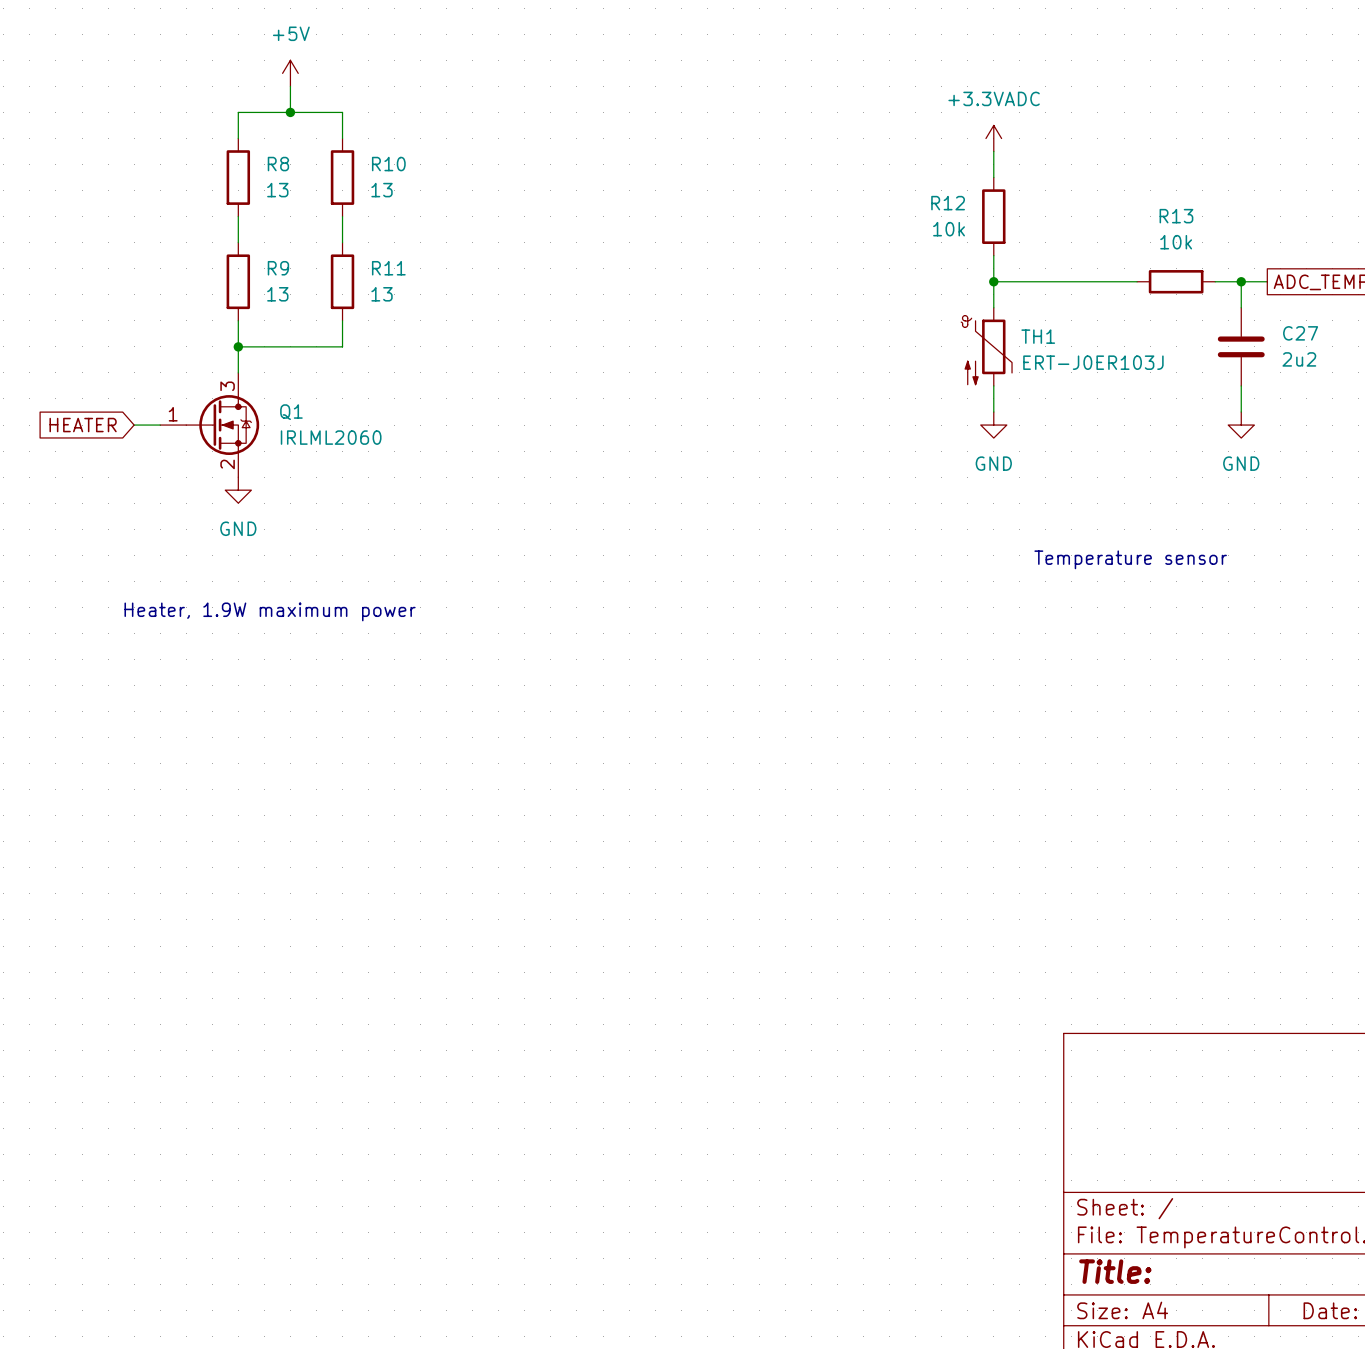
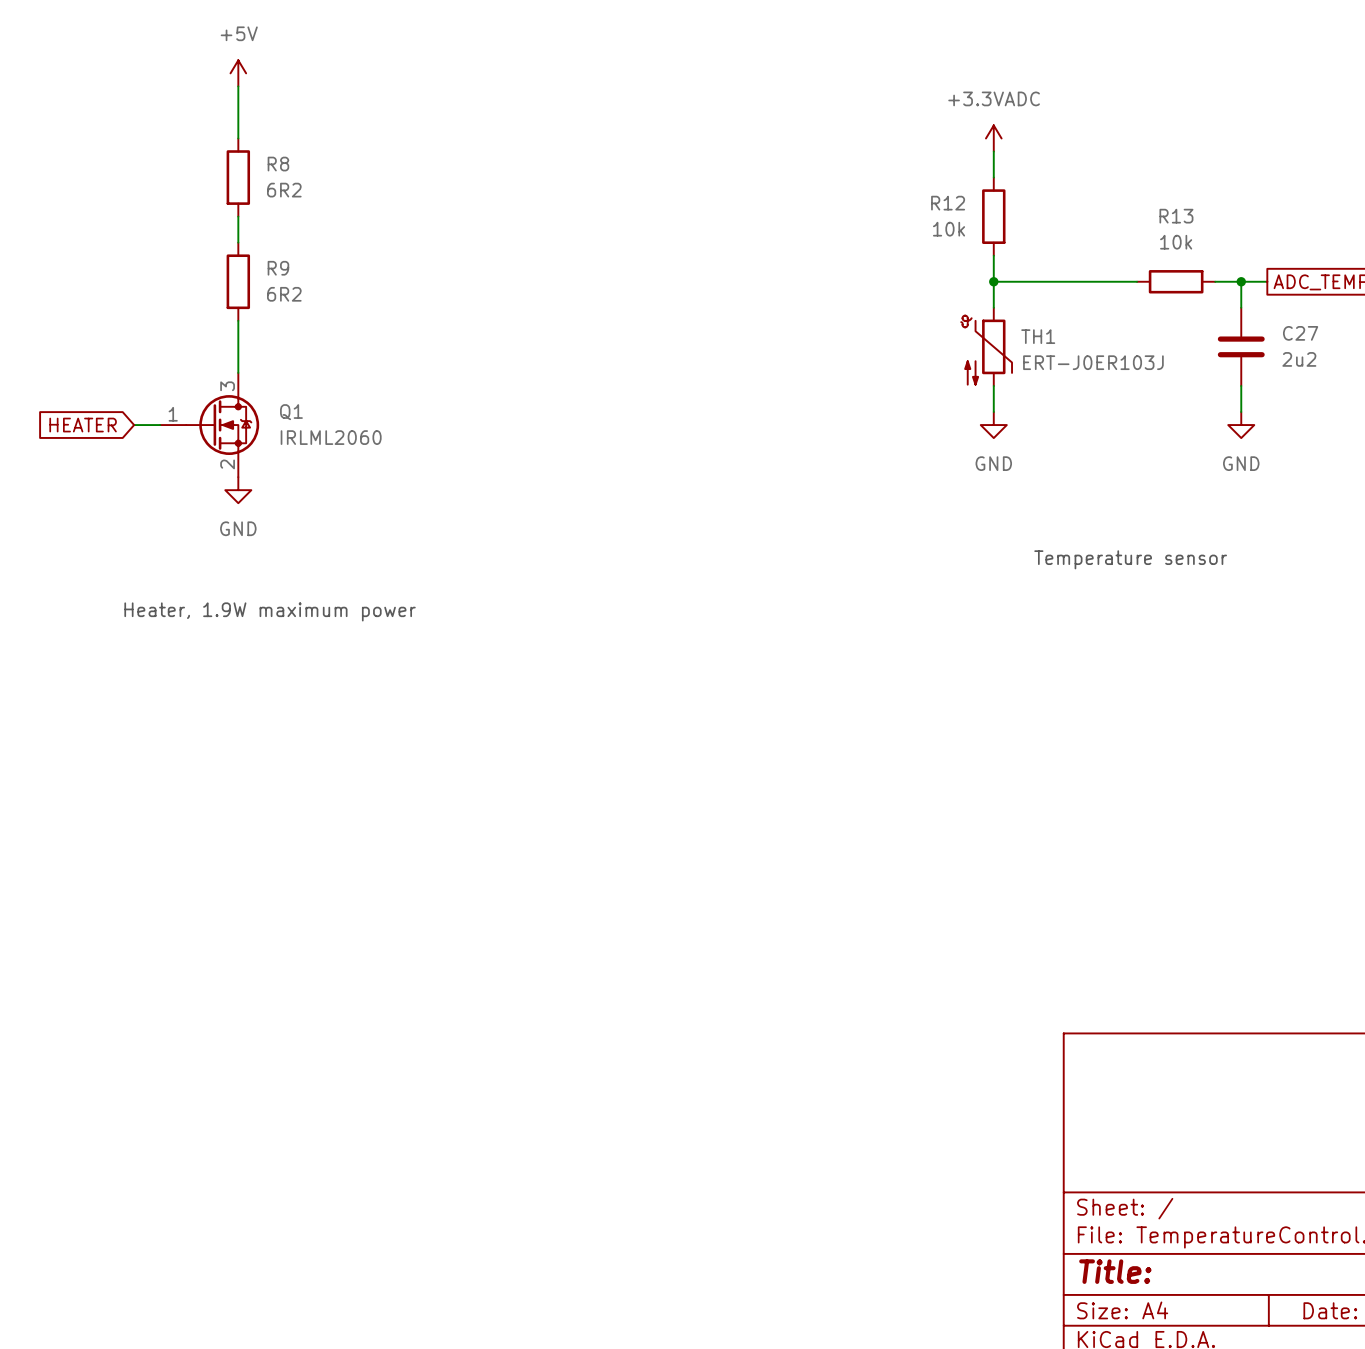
power symbol position: +5V (290, 73) -> +5V (238, 73)
wire: (290, 86) (290, 112) -> none
wire: (238, 112) (342, 112) (342, 138) -> (238, 112) (238, 86)
junction: (290, 112) -> none
R10: 13 (342, 177) -> none
R8 value: 13 (277, 190) -> 6R2 (284, 190)
wire: (342, 216) (342, 242) -> none
R11: 13 (342, 281) -> none
R9 value: 13 (277, 294) -> 6R2 (284, 294)
wire: (342, 320) (342, 346) (238, 346) -> none
junction: (238, 346) -> none

